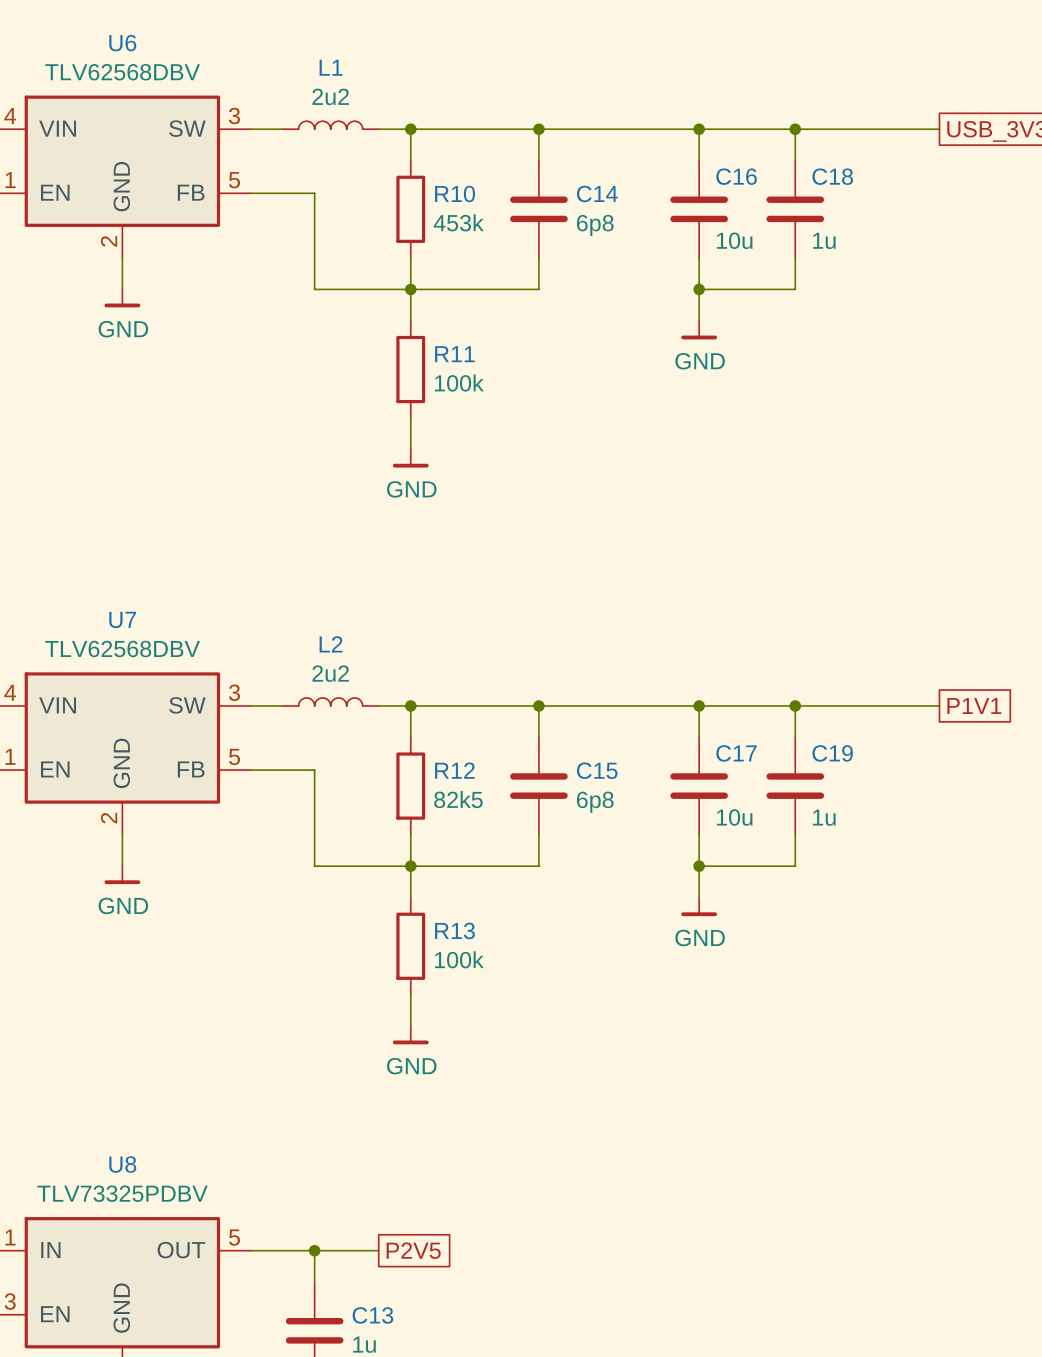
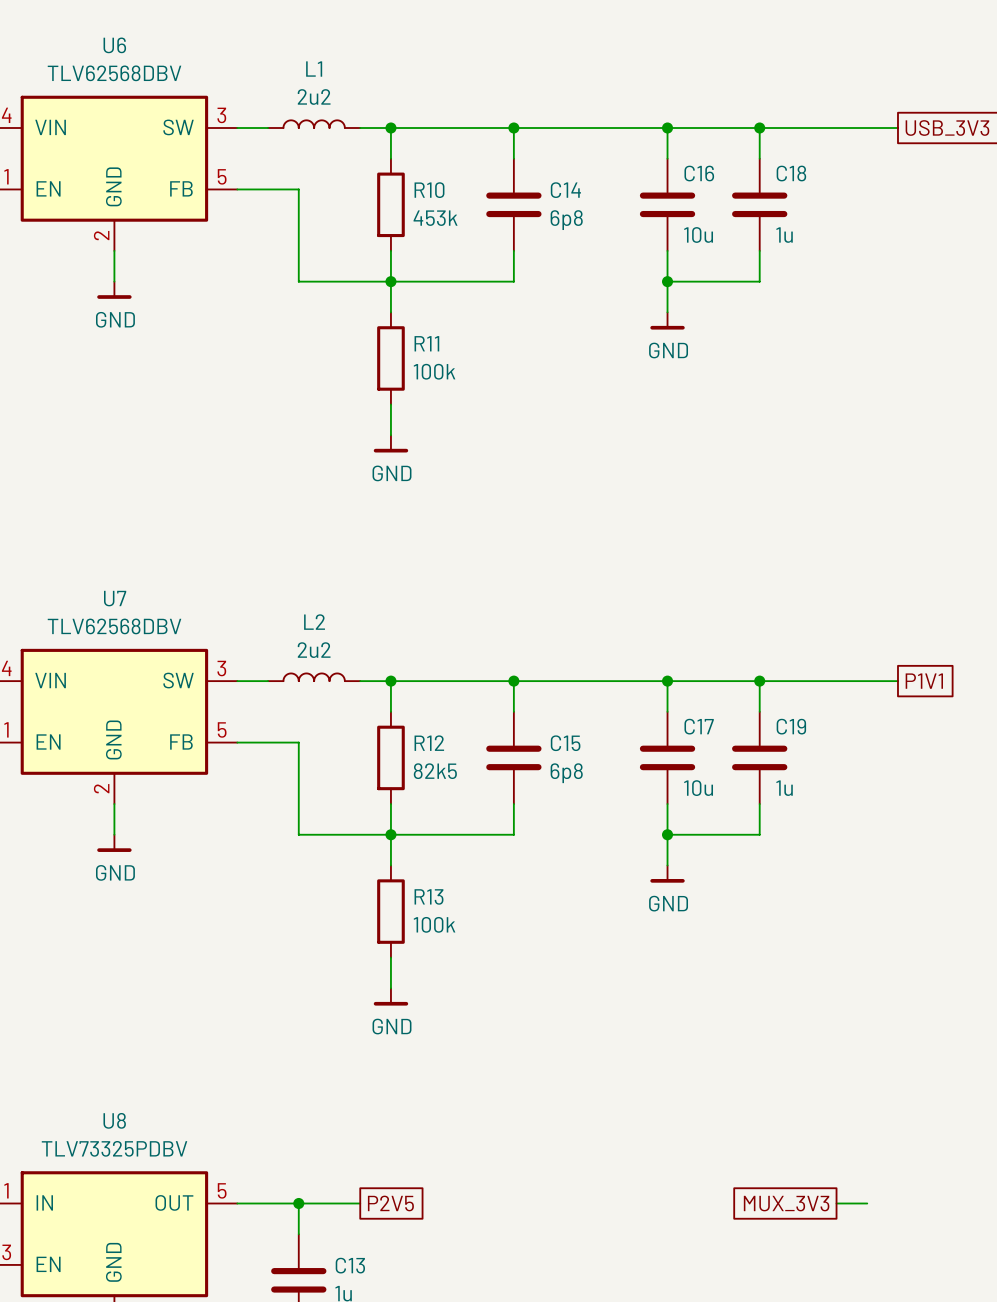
wire: none -> (836, 1203) (867, 1203)
global label: none -> MUX_3V3 (786, 1203)

